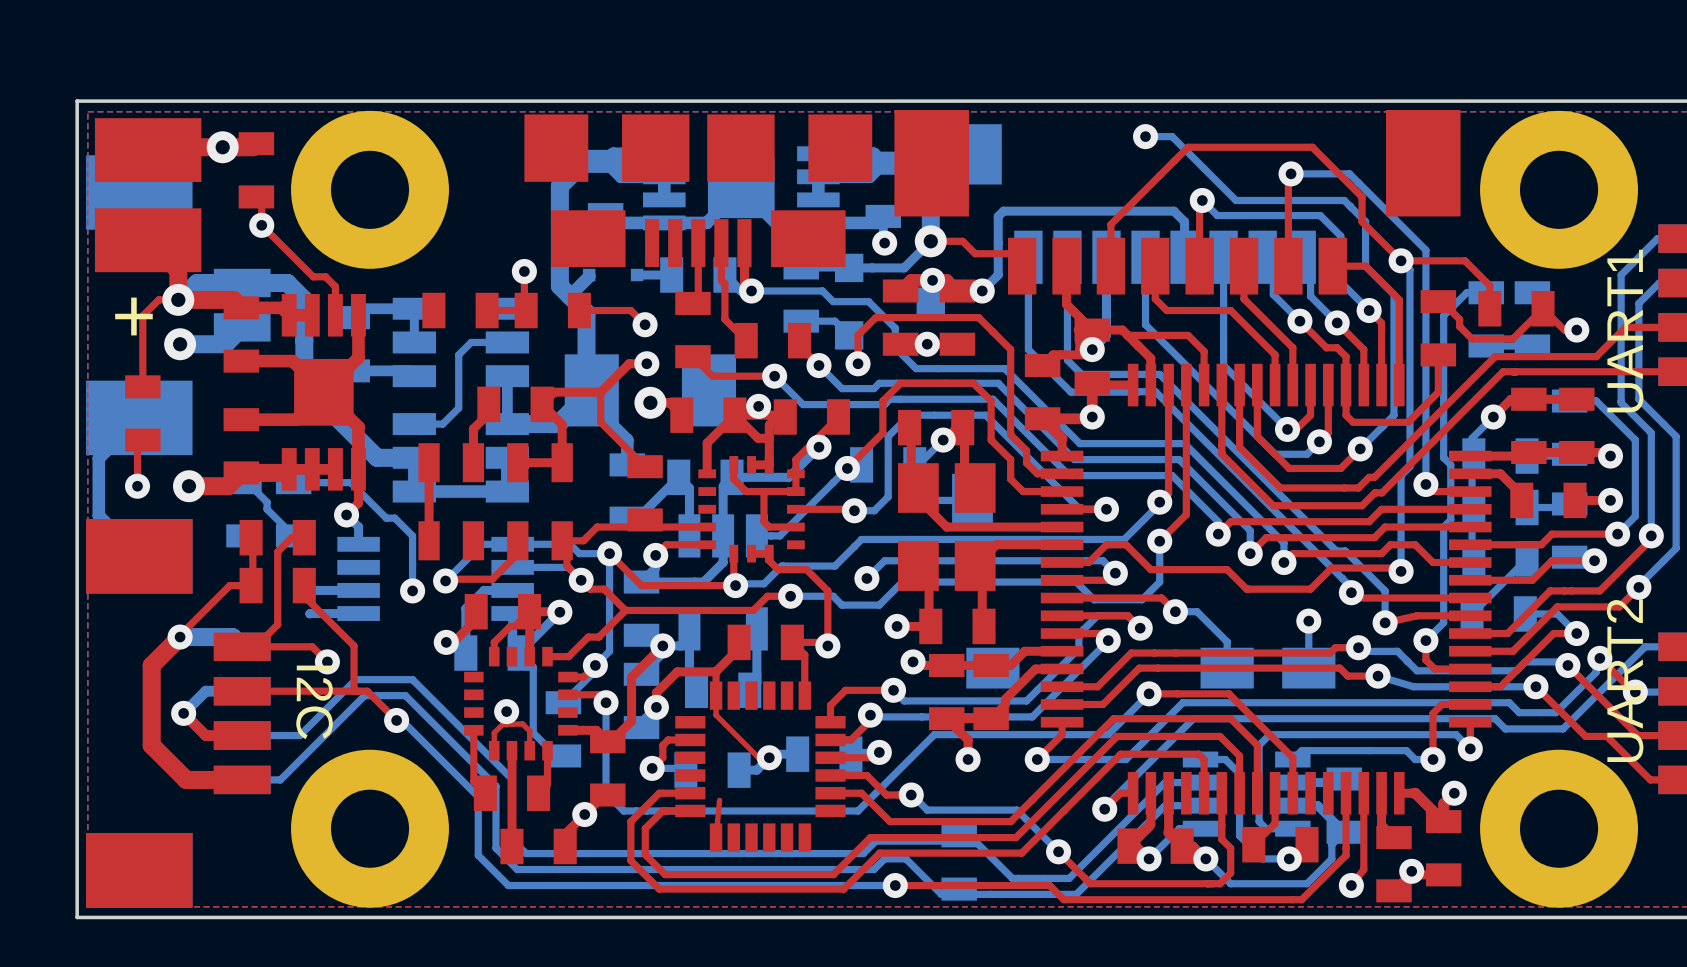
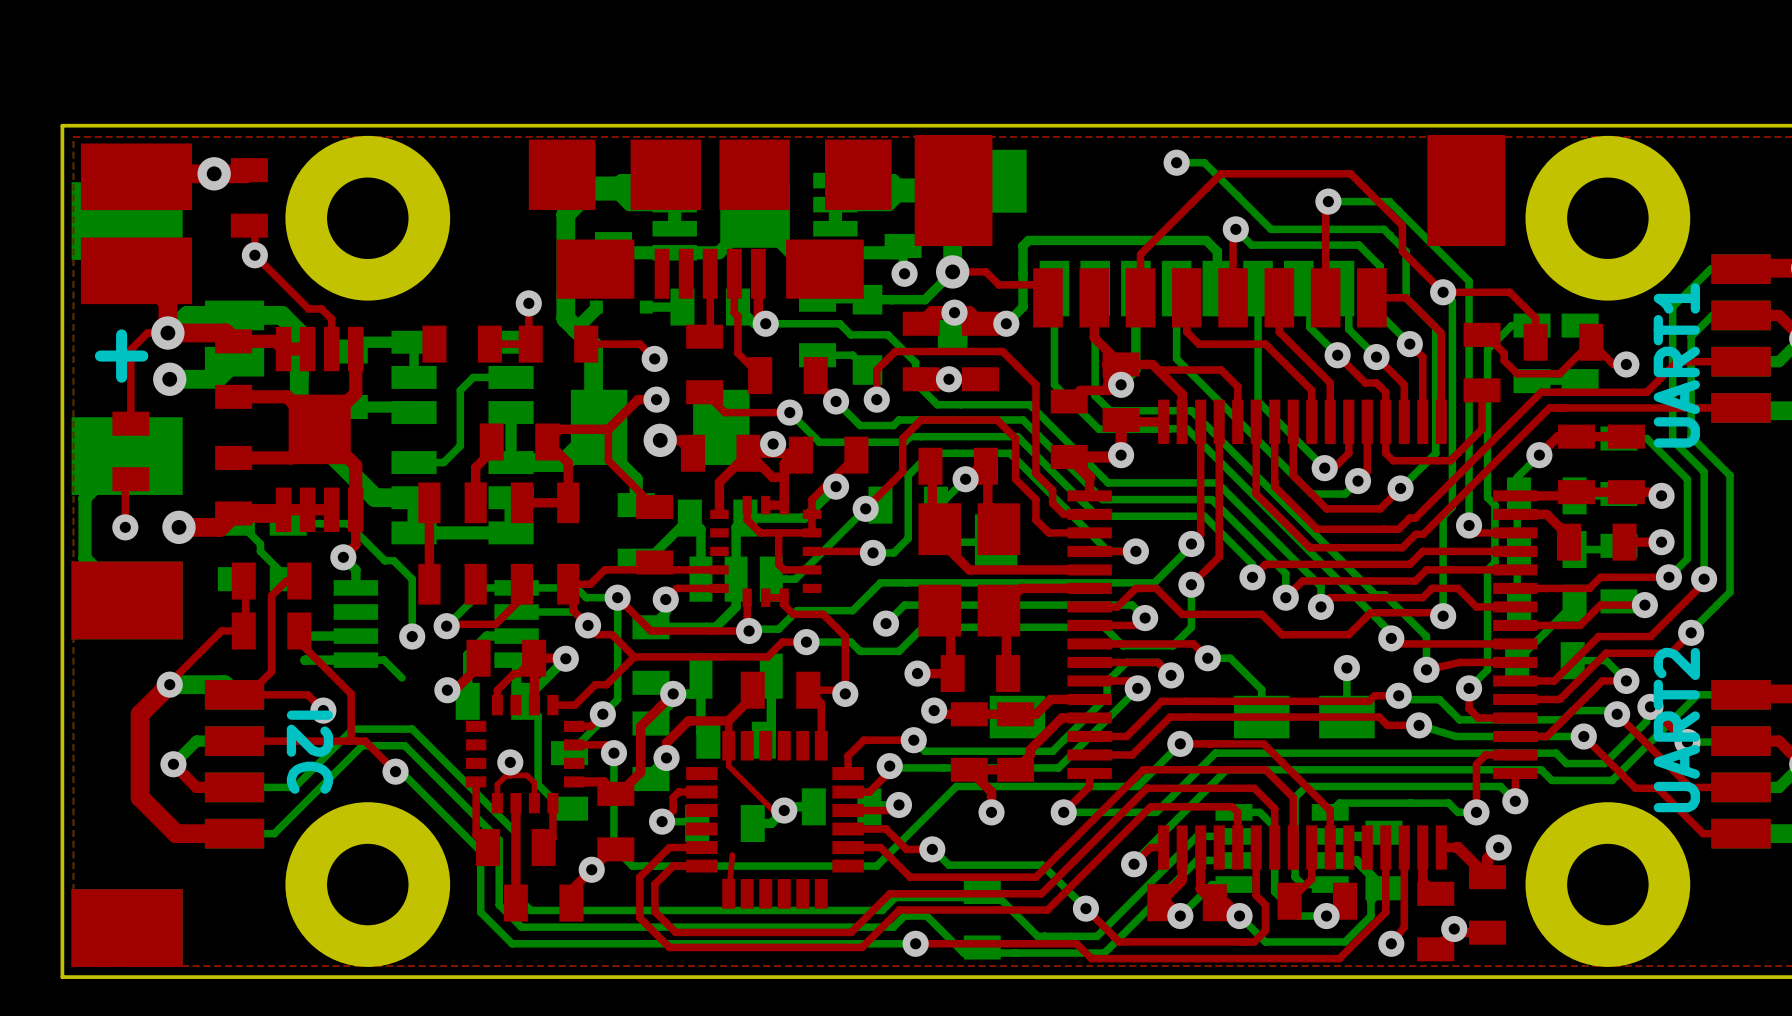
bottom track: none -> (355, 660) (384, 660) (401, 677)

